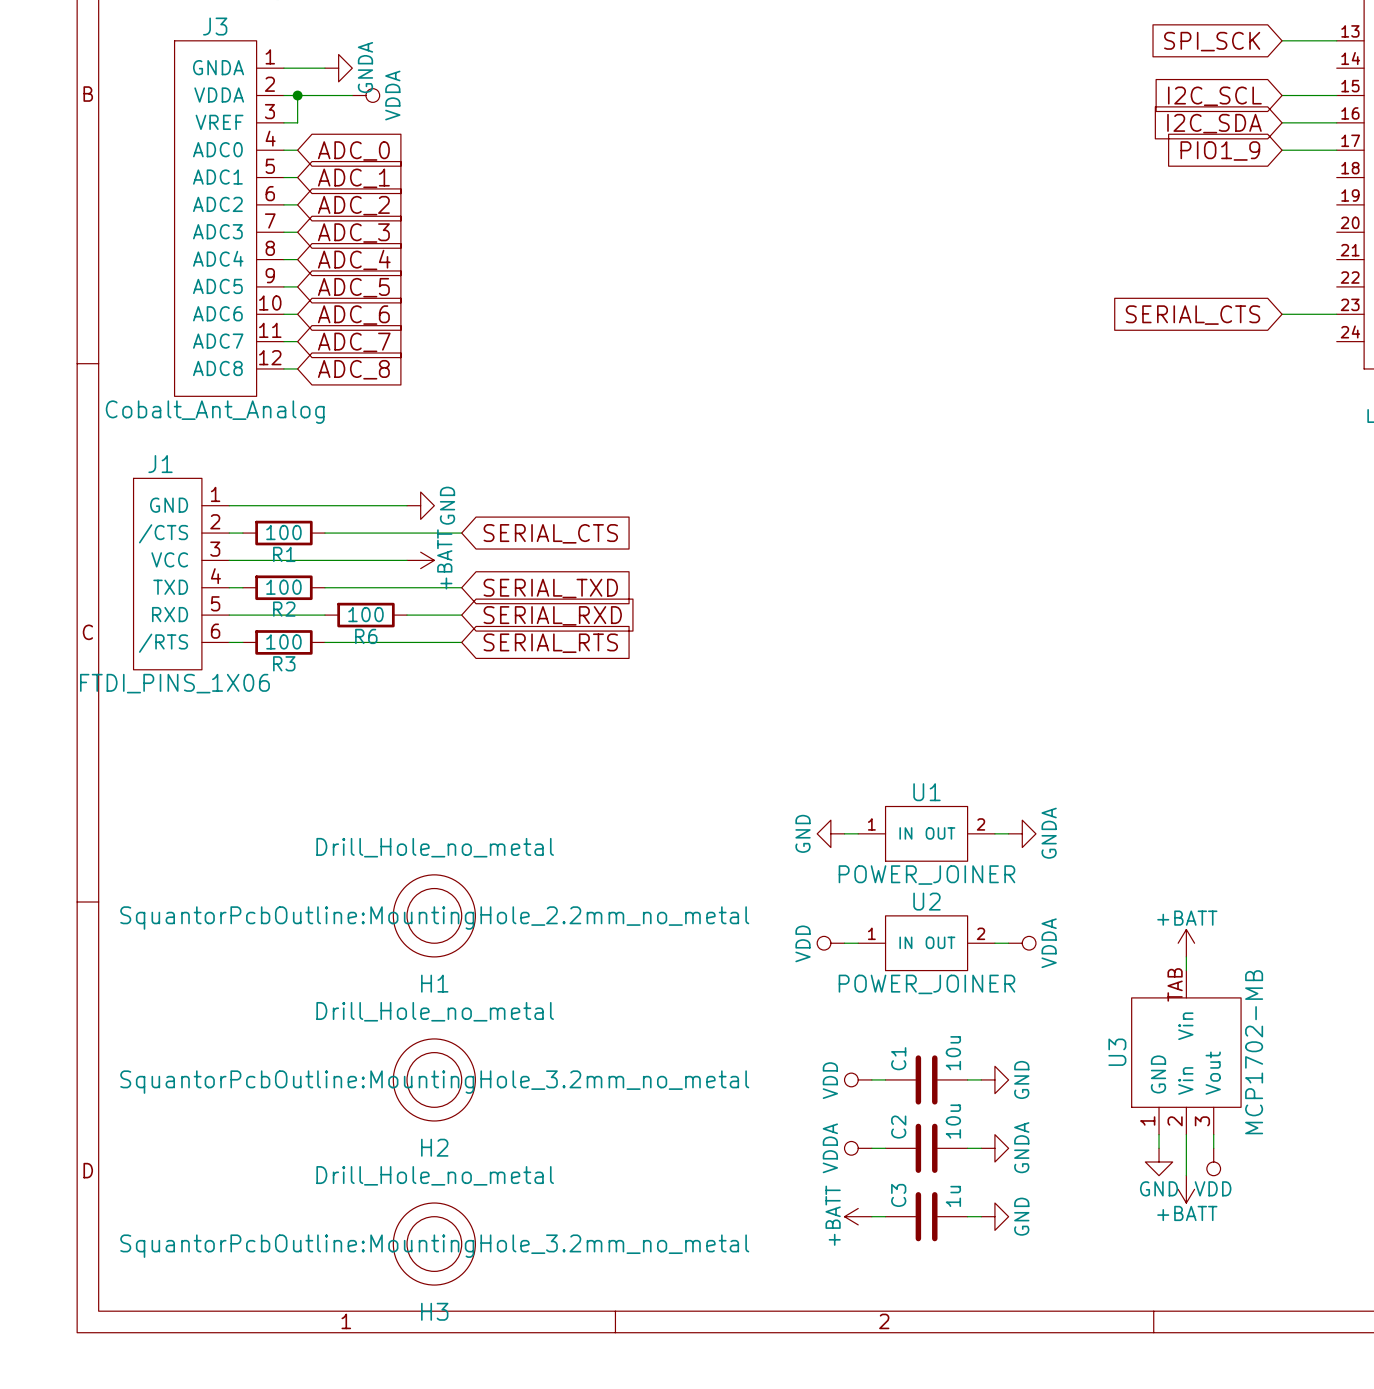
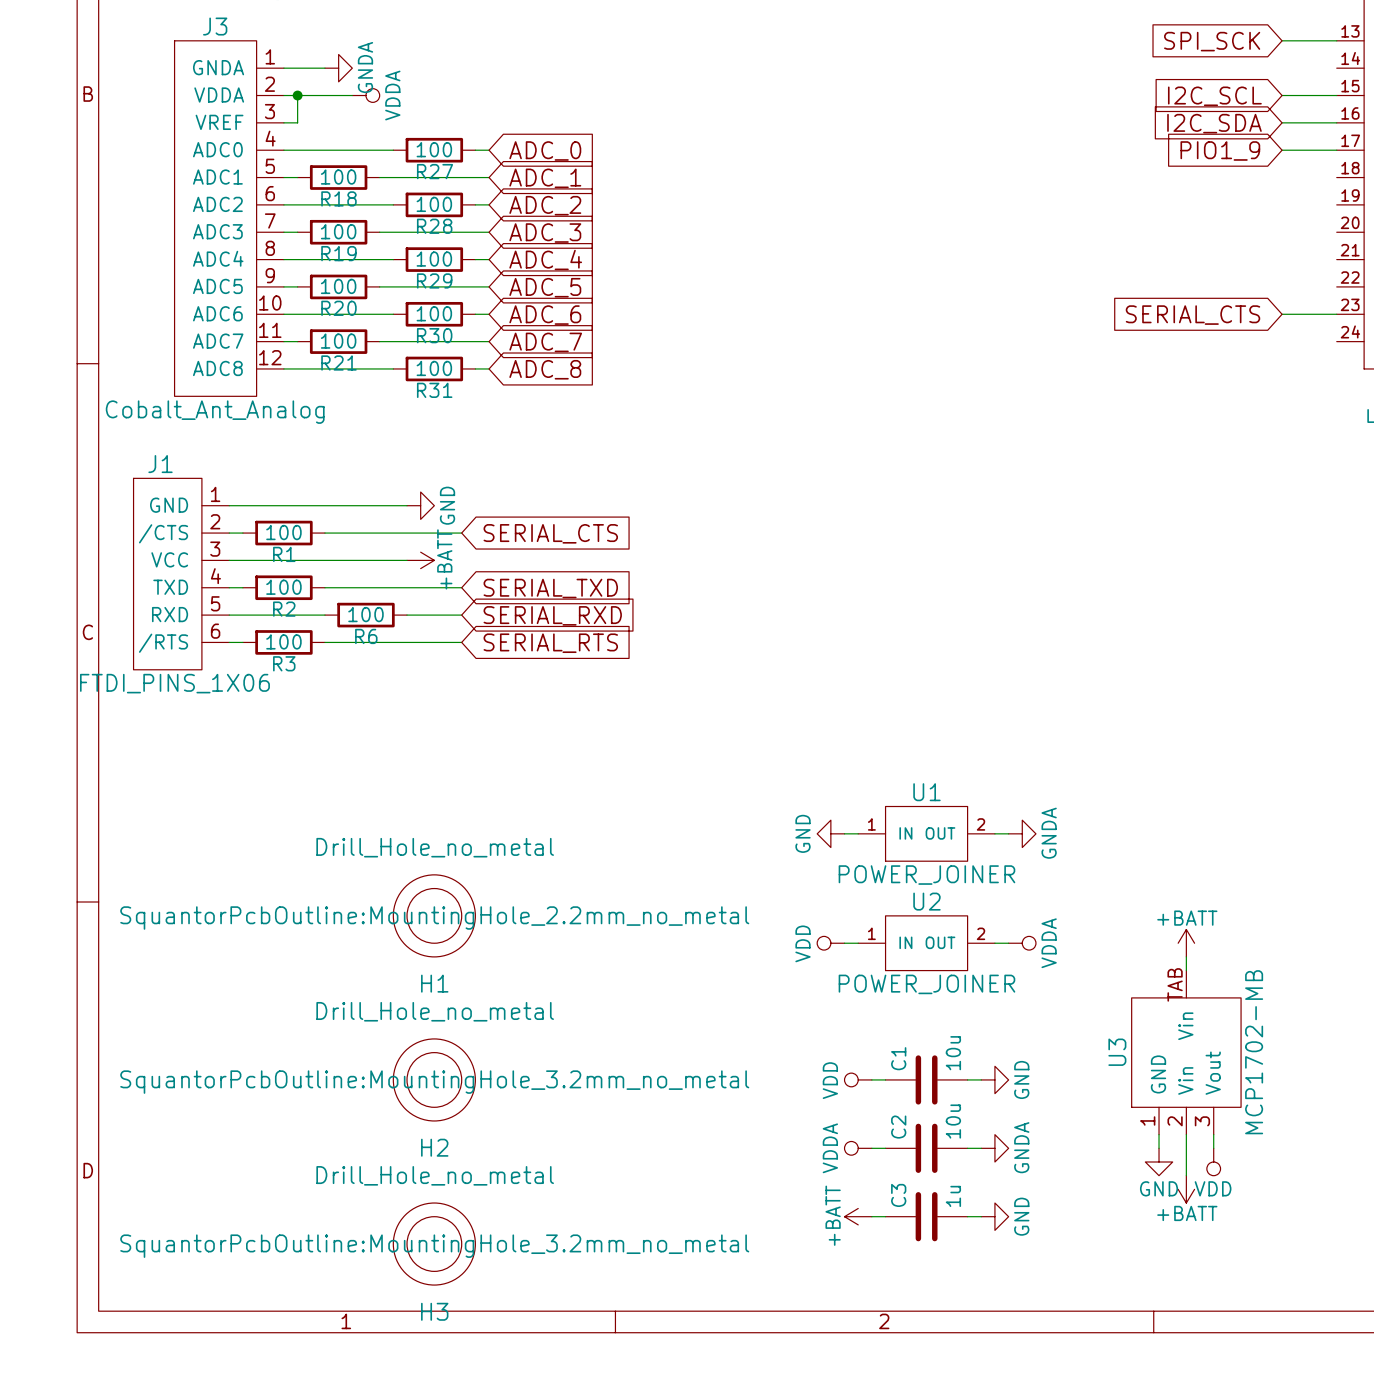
wire: none -> (297, 150) (393, 150)
global label position: ADC_0 (353, 150) -> ADC_0 (545, 150)
R27: none -> 100 (434, 150)
wire: none -> (475, 150) (489, 150)
R18: none -> 100 (338, 177)
wire: none -> (379, 177) (489, 177)
global label position: ADC_1 (353, 178) -> ADC_1 (545, 178)
wire: none -> (297, 204) (393, 204)
R28: none -> 100 (434, 204)
wire: none -> (475, 204) (489, 204)
global label position: ADC_2 (353, 205) -> ADC_2 (545, 205)
R19: none -> 100 (338, 232)
wire: none -> (379, 232) (489, 232)
global label position: ADC_3 (353, 233) -> ADC_3 (545, 233)
wire: none -> (297, 259) (393, 259)
global label position: ADC_4 (354, 259) -> ADC_4 (545, 259)
R29: none -> 100 (434, 259)
wire: none -> (475, 259) (489, 259)
R20: none -> 100 (338, 286)
wire: none -> (379, 286) (489, 286)
global label position: ADC_5 (353, 287) -> ADC_5 (545, 287)
wire: none -> (297, 314) (393, 314)
R30: none -> 100 (434, 314)
wire: none -> (475, 314) (489, 314)
global label position: ADC_6 (353, 315) -> ADC_6 (545, 315)
R21: none -> 100 (338, 341)
wire: none -> (379, 341) (489, 341)
global label position: ADC_7 (354, 342) -> ADC_7 (545, 342)
wire: none -> (297, 368) (393, 368)
R31: none -> 100 (434, 368)
wire: none -> (475, 368) (489, 368)
global label position: ADC_8 (353, 369) -> ADC_8 (545, 369)

